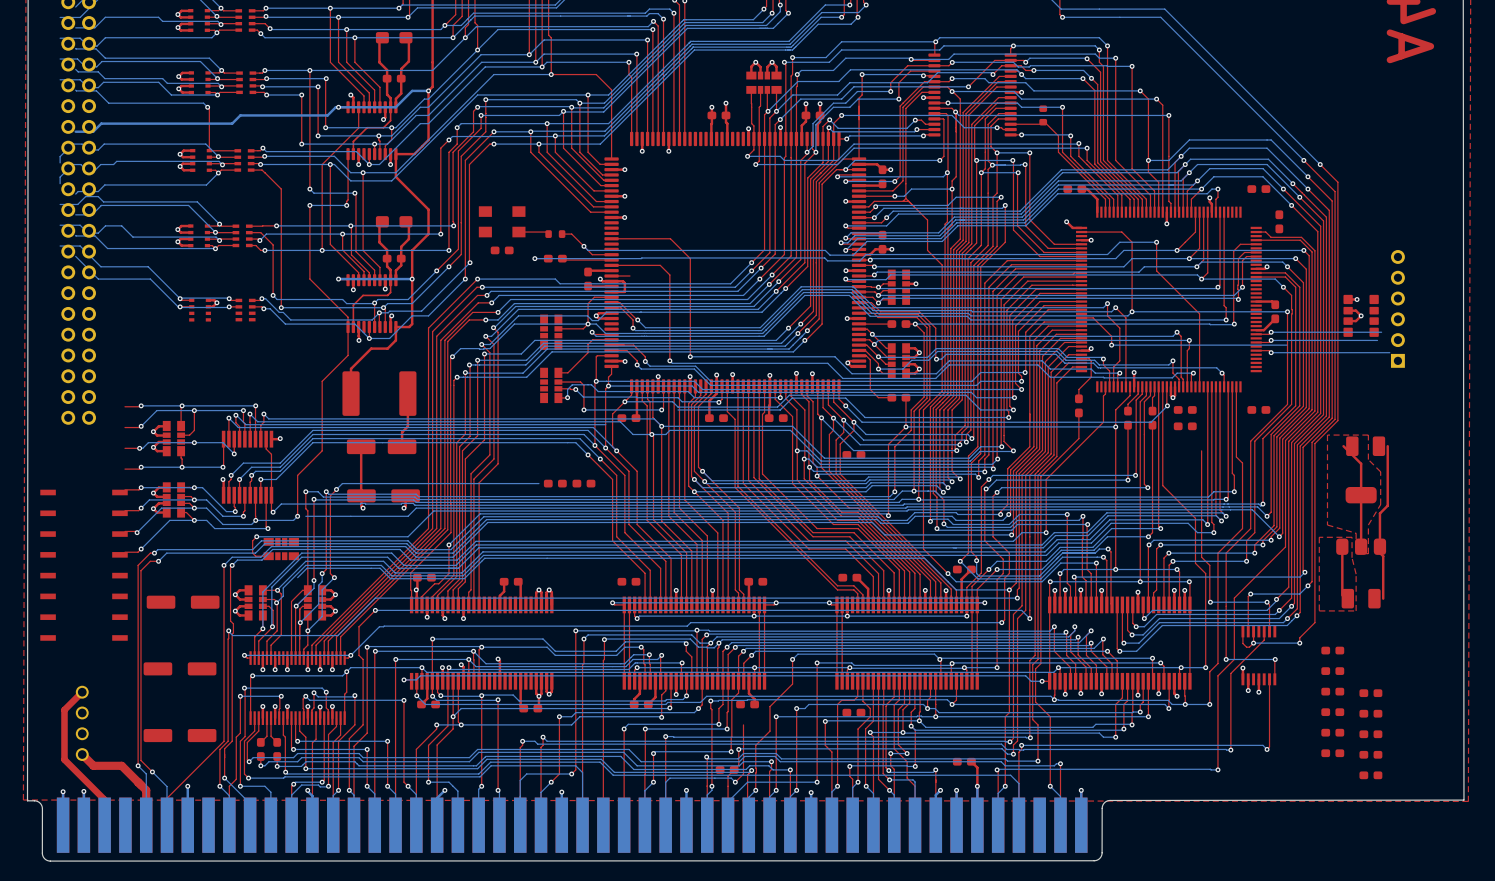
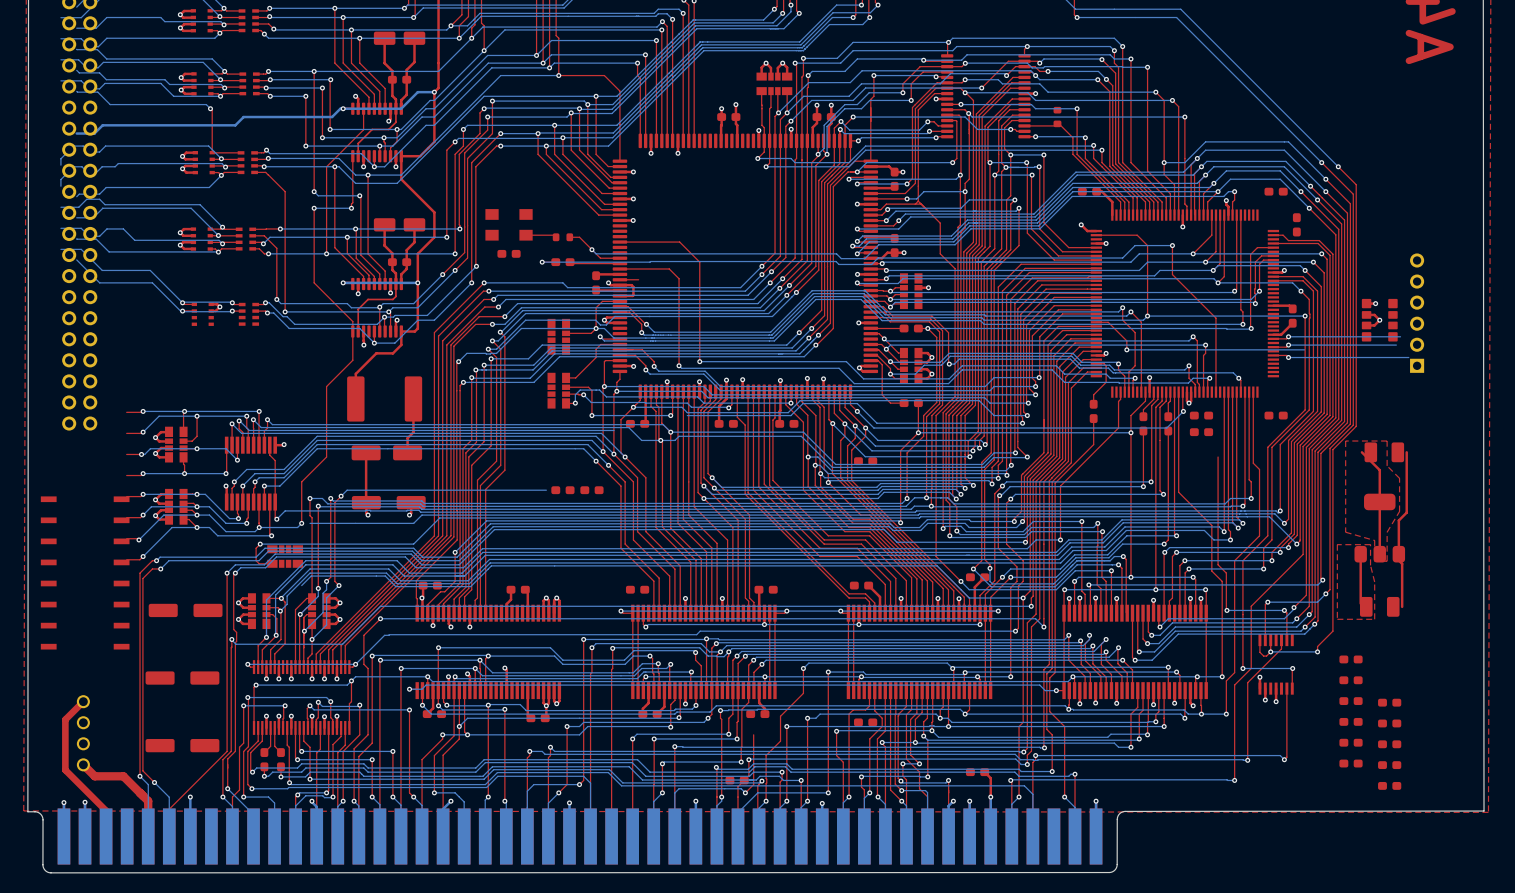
part footprint: [375, 32, 413, 44] -> [373, 31, 426, 45]
part footprint: [375, 216, 413, 228] -> [373, 218, 426, 232]

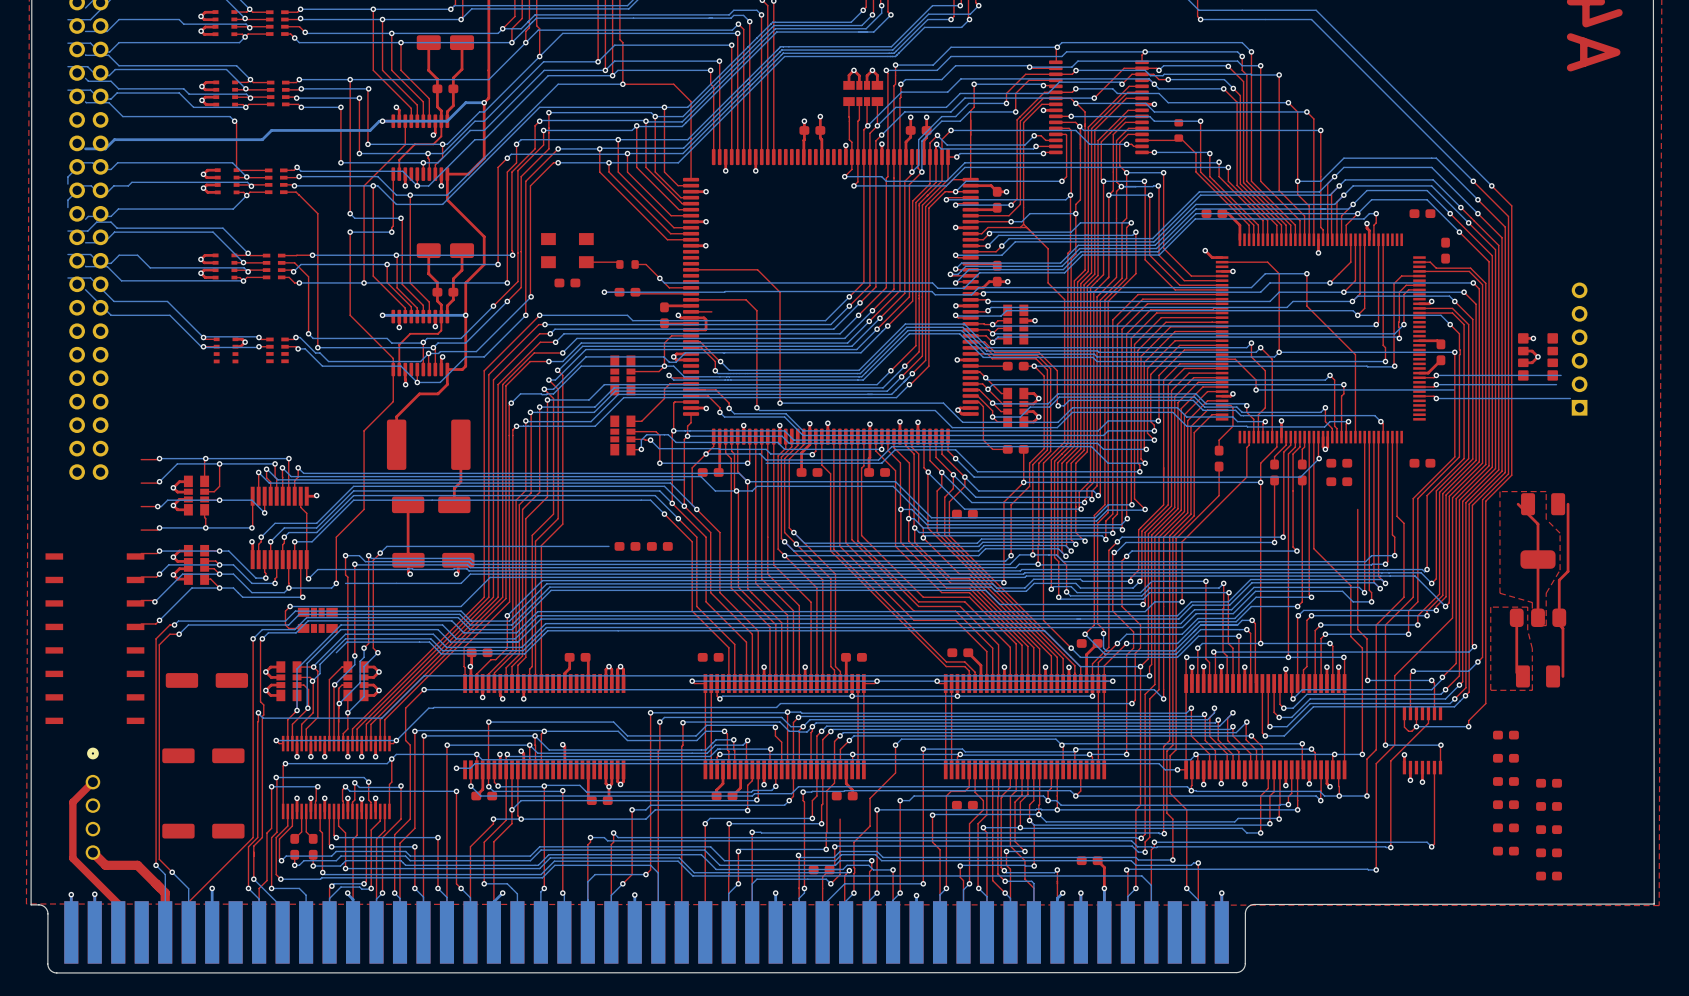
part: none -> (92, 803)

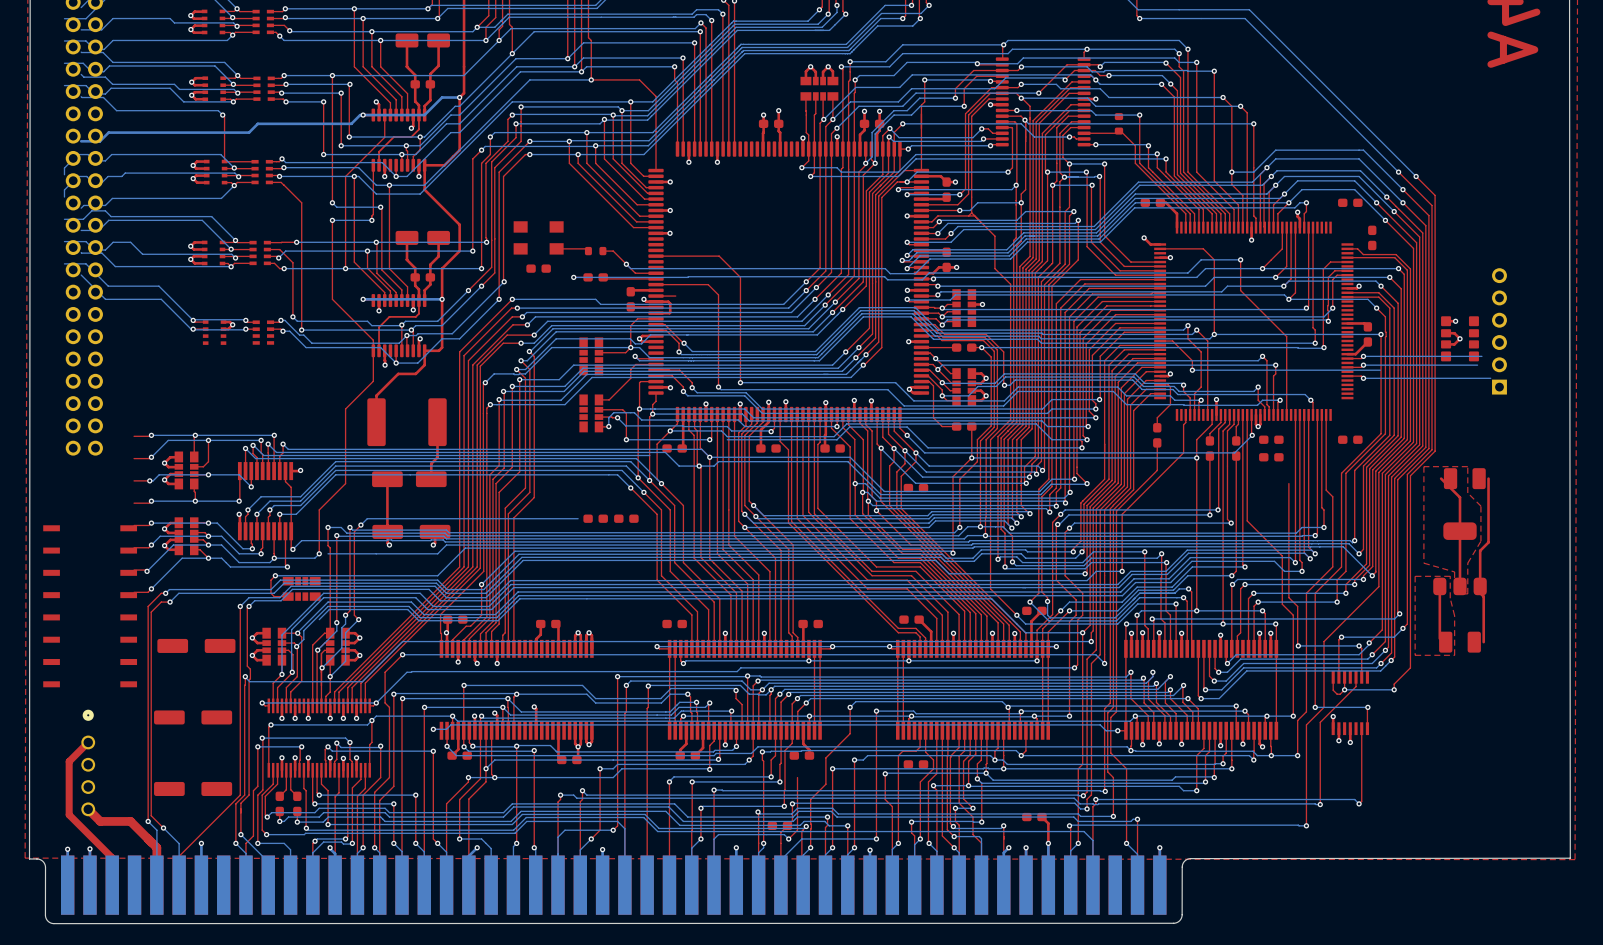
part: (1505, 735) -> none
part: (1505, 758) -> none
part: (1505, 781) -> none
part: (1549, 783) -> none
part: (1505, 804) -> none
part: (1549, 806) -> none
part: (1505, 827) -> none
part: (1549, 829) -> none
part: (1505, 851) -> none
part: (1549, 852) -> none
part: (1549, 876) -> none

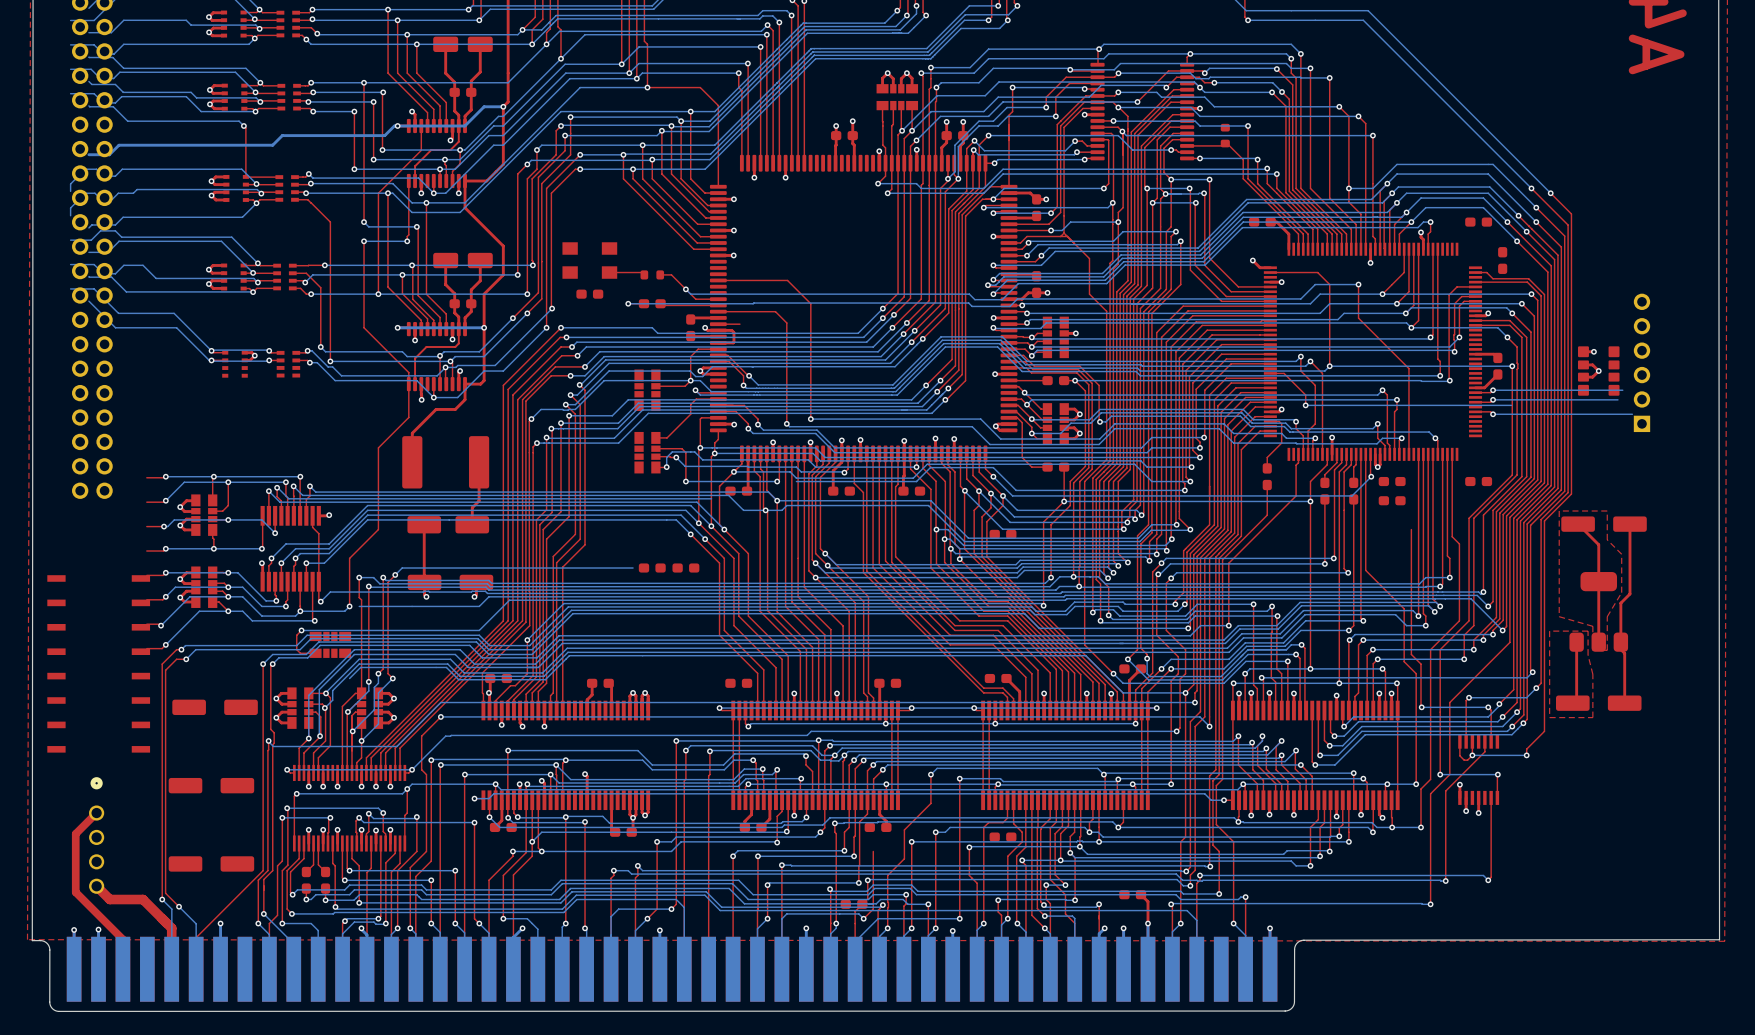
part footprint: [1443, 468, 1486, 490] -> [1561, 516, 1647, 532]
part footprint: [1439, 631, 1481, 653] -> [1555, 695, 1642, 711]

